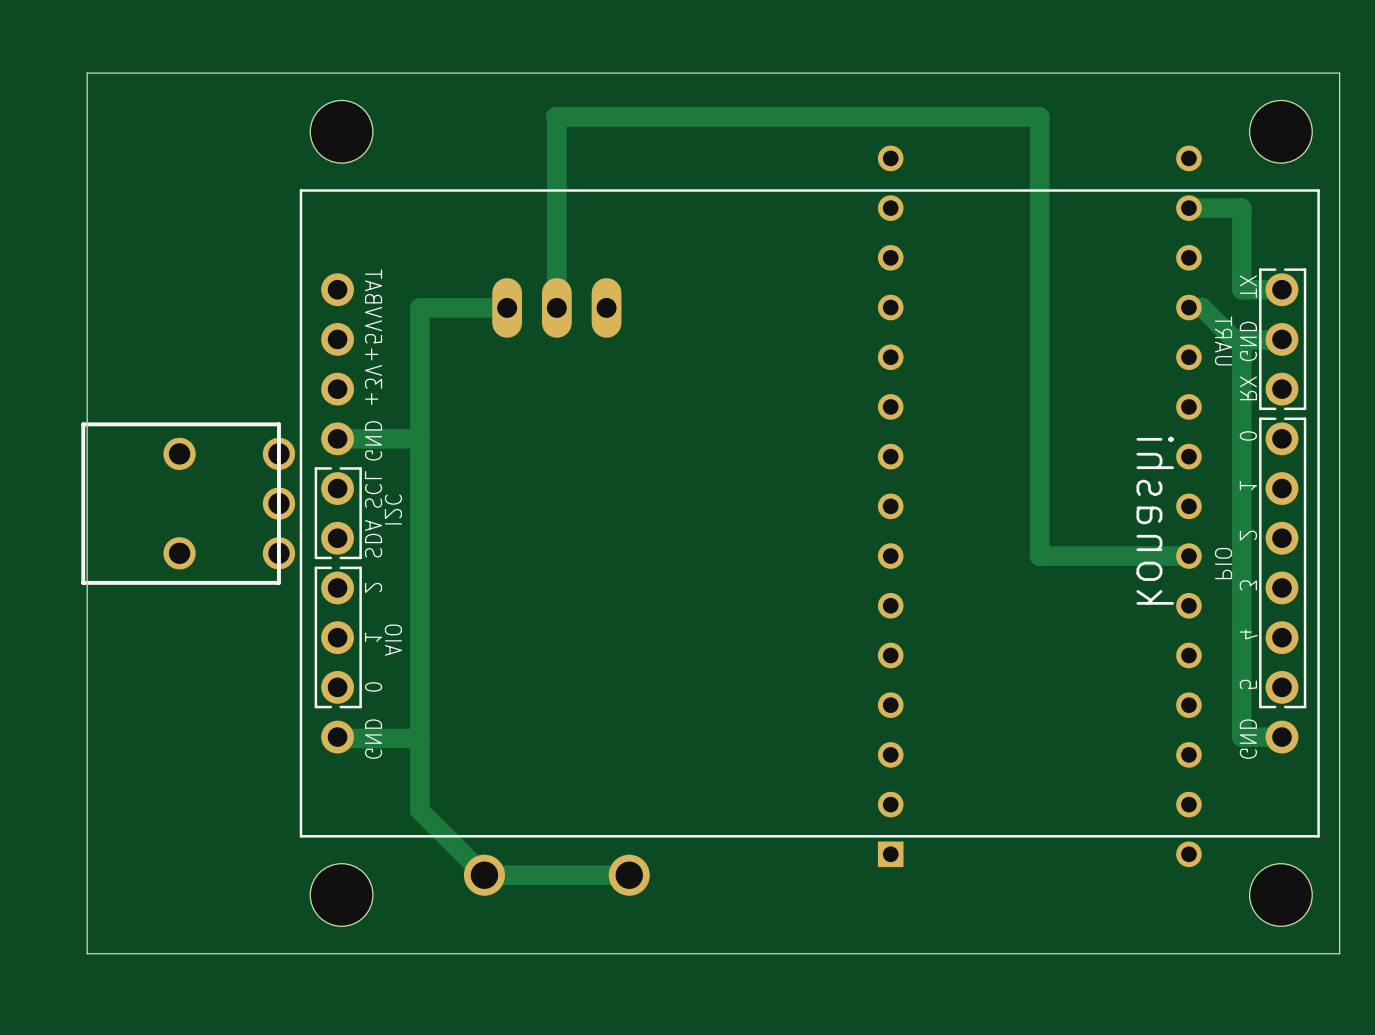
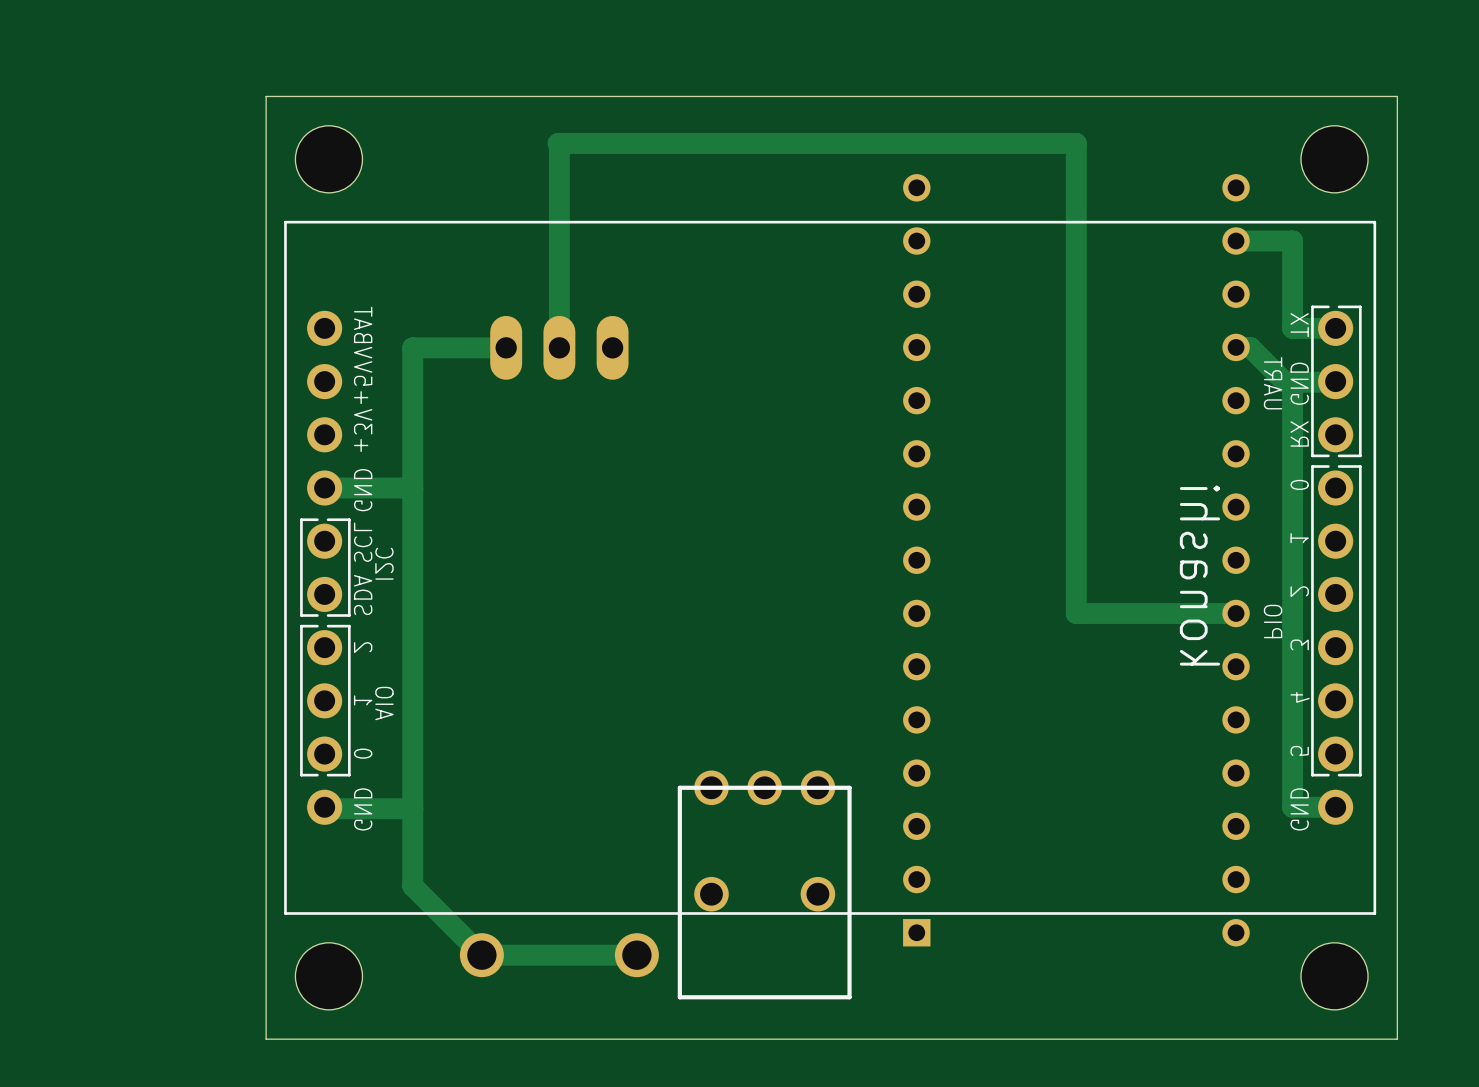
board edge: (282, 73) (87, 73) (87, 953) (282, 953) -> (266, 96) (266, 1039)
part: (188, 503) -> none
part: none -> (764, 884)

